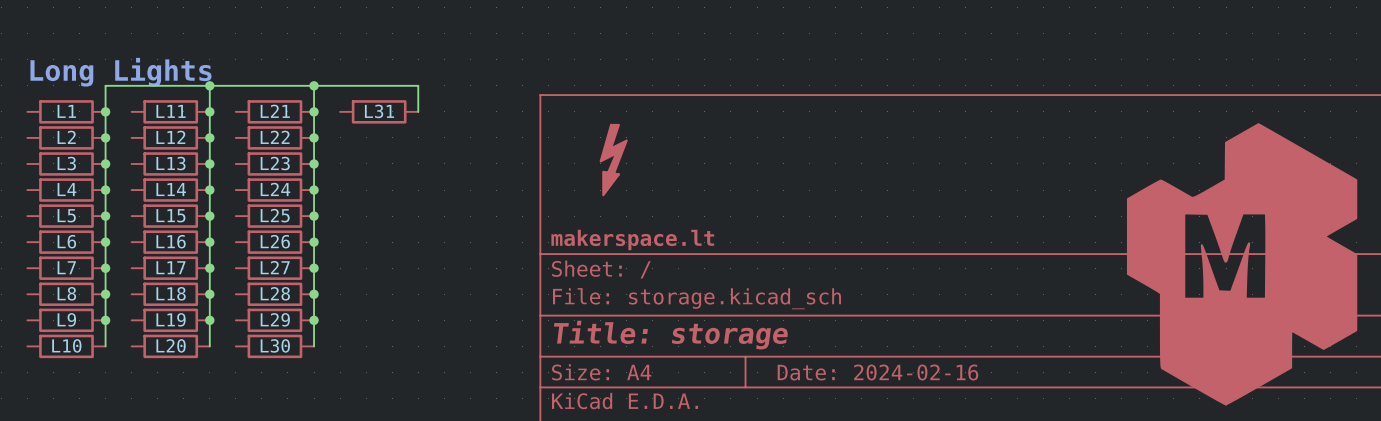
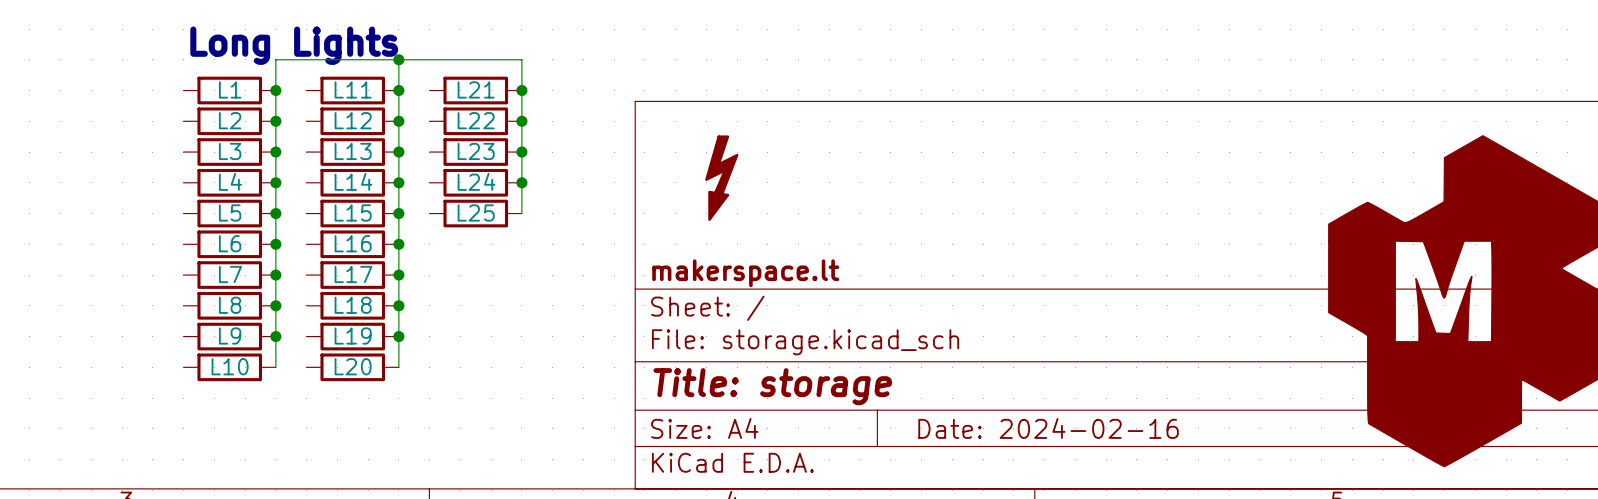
junction: none -> (398, 59)
text position: Long Lights (120, 72) -> Long Lights (294, 45)
wire: (209, 85) (209, 346) -> none
junction: (209, 85) -> none
junction: none -> (275, 90)
wire: (314, 85) (314, 346) -> (398, 59) (398, 367)
junction: (314, 85) -> none
junction: none -> (398, 90)
junction: none -> (521, 90)
L1 position: (66, 111) -> (229, 90)
junction: (105, 111) -> none
L11 position: (170, 111) -> (352, 90)
junction: (209, 111) -> none
junction: none -> (275, 121)
L21 position: (274, 111) -> (475, 90)
junction: (314, 111) -> none
junction: none -> (398, 121)
L31: (379, 111) -> none
wire: (418, 111) (418, 85) (105, 85) (105, 346) -> none
junction: none -> (521, 121)
L2 position: (66, 137) -> (229, 121)
junction: (105, 137) -> none
L12 position: (170, 137) -> (352, 121)
junction: (209, 137) -> none
junction: none -> (275, 152)
L22 position: (274, 137) -> (475, 121)
junction: (314, 137) -> none
junction: none -> (398, 152)
junction: none -> (521, 152)
L3 position: (66, 163) -> (229, 152)
junction: (105, 163) -> none
L13 position: (170, 163) -> (352, 152)
junction: (209, 163) -> none
junction: none -> (275, 182)
L23 position: (274, 163) -> (475, 152)
junction: (314, 163) -> none
junction: none -> (398, 182)
junction: none -> (521, 182)
L4 position: (66, 190) -> (229, 182)
junction: (105, 190) -> none
L14 position: (170, 190) -> (352, 182)
junction: (209, 190) -> none
junction: none -> (275, 213)
L24 position: (274, 190) -> (475, 182)
junction: (314, 190) -> none
junction: none -> (398, 213)
wire: none -> (521, 213) (521, 59) (275, 59) (275, 367)
L5 position: (66, 216) -> (229, 213)
junction: (105, 216) -> none
L15 position: (170, 216) -> (352, 213)
junction: (209, 216) -> none
junction: none -> (275, 244)
L25 position: (274, 216) -> (475, 213)
junction: (314, 216) -> none
junction: none -> (398, 244)
L6 position: (66, 242) -> (229, 244)
junction: (105, 242) -> none
L16 position: (170, 242) -> (352, 244)
junction: (209, 242) -> none
junction: none -> (275, 275)
L26: (274, 242) -> none
junction: (314, 242) -> none
junction: none -> (398, 275)
L7 position: (66, 268) -> (229, 275)
junction: (105, 268) -> none
L17 position: (170, 268) -> (352, 275)
junction: (209, 268) -> none
junction: none -> (275, 305)
L27: (274, 268) -> none
junction: (314, 268) -> none
junction: none -> (398, 305)
L8 position: (66, 294) -> (229, 305)
junction: (105, 294) -> none
L18 position: (170, 294) -> (352, 305)
junction: (209, 294) -> none
junction: none -> (275, 336)
L28: (274, 294) -> none
junction: (314, 294) -> none
junction: none -> (398, 336)
L9 position: (66, 320) -> (229, 336)
junction: (105, 320) -> none
L19 position: (170, 320) -> (352, 336)
junction: (209, 320) -> none
L29: (274, 320) -> none
junction: (314, 320) -> none
L10 position: (66, 346) -> (229, 367)
L20 position: (170, 346) -> (352, 367)
L30: (274, 346) -> none

